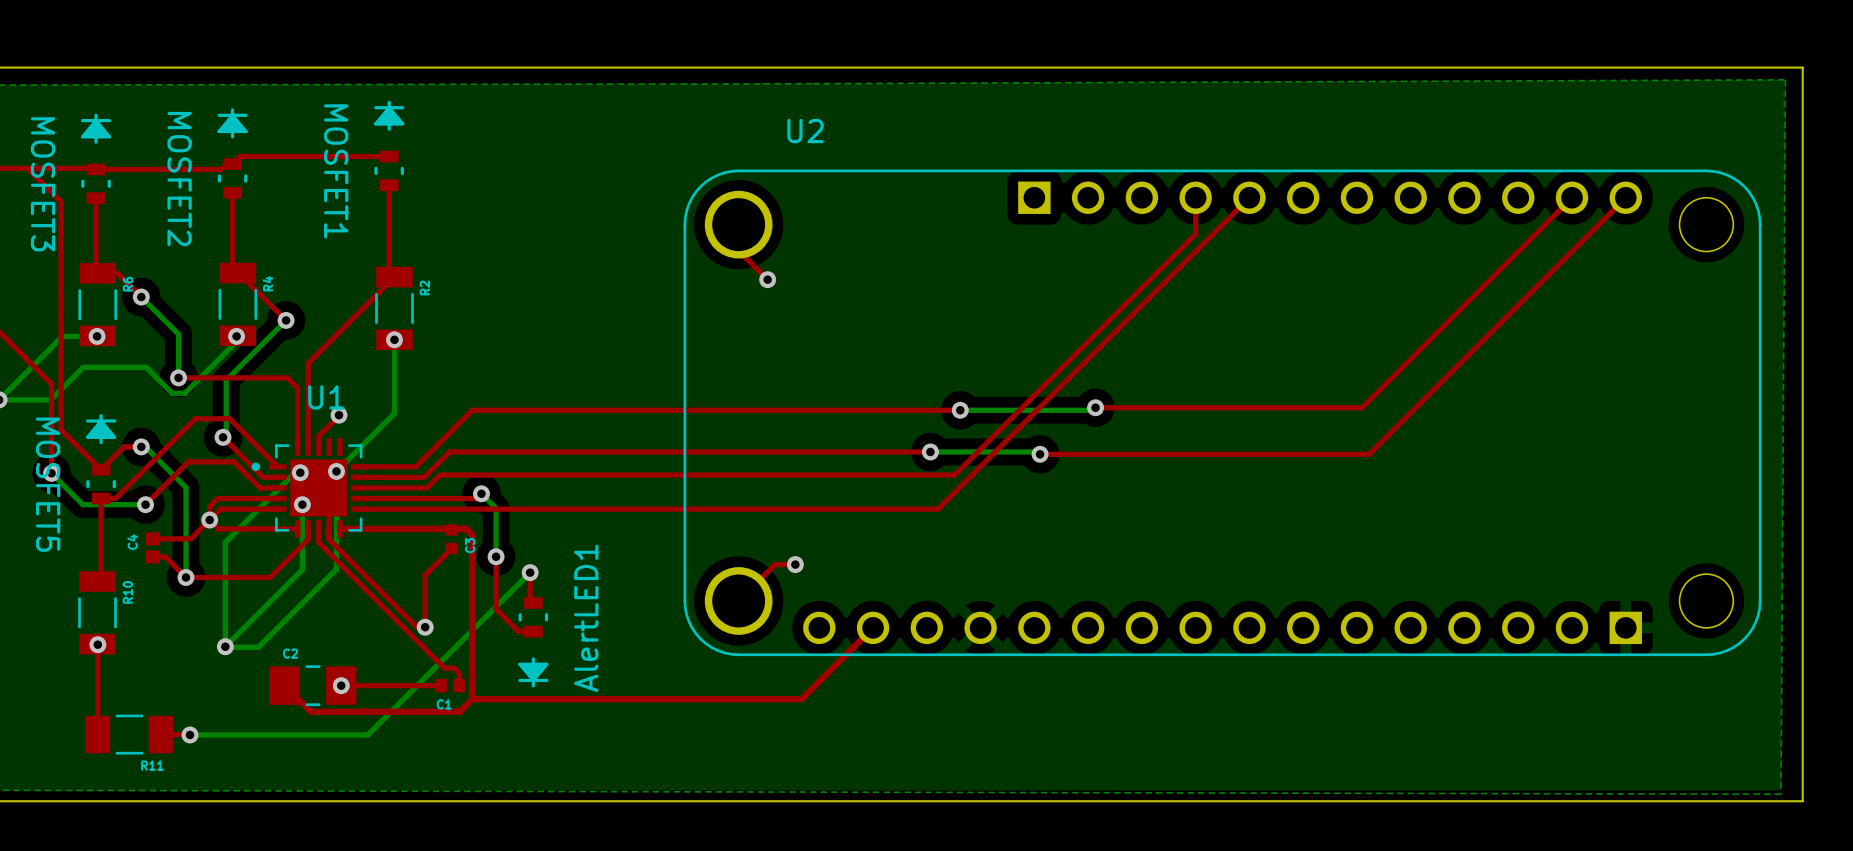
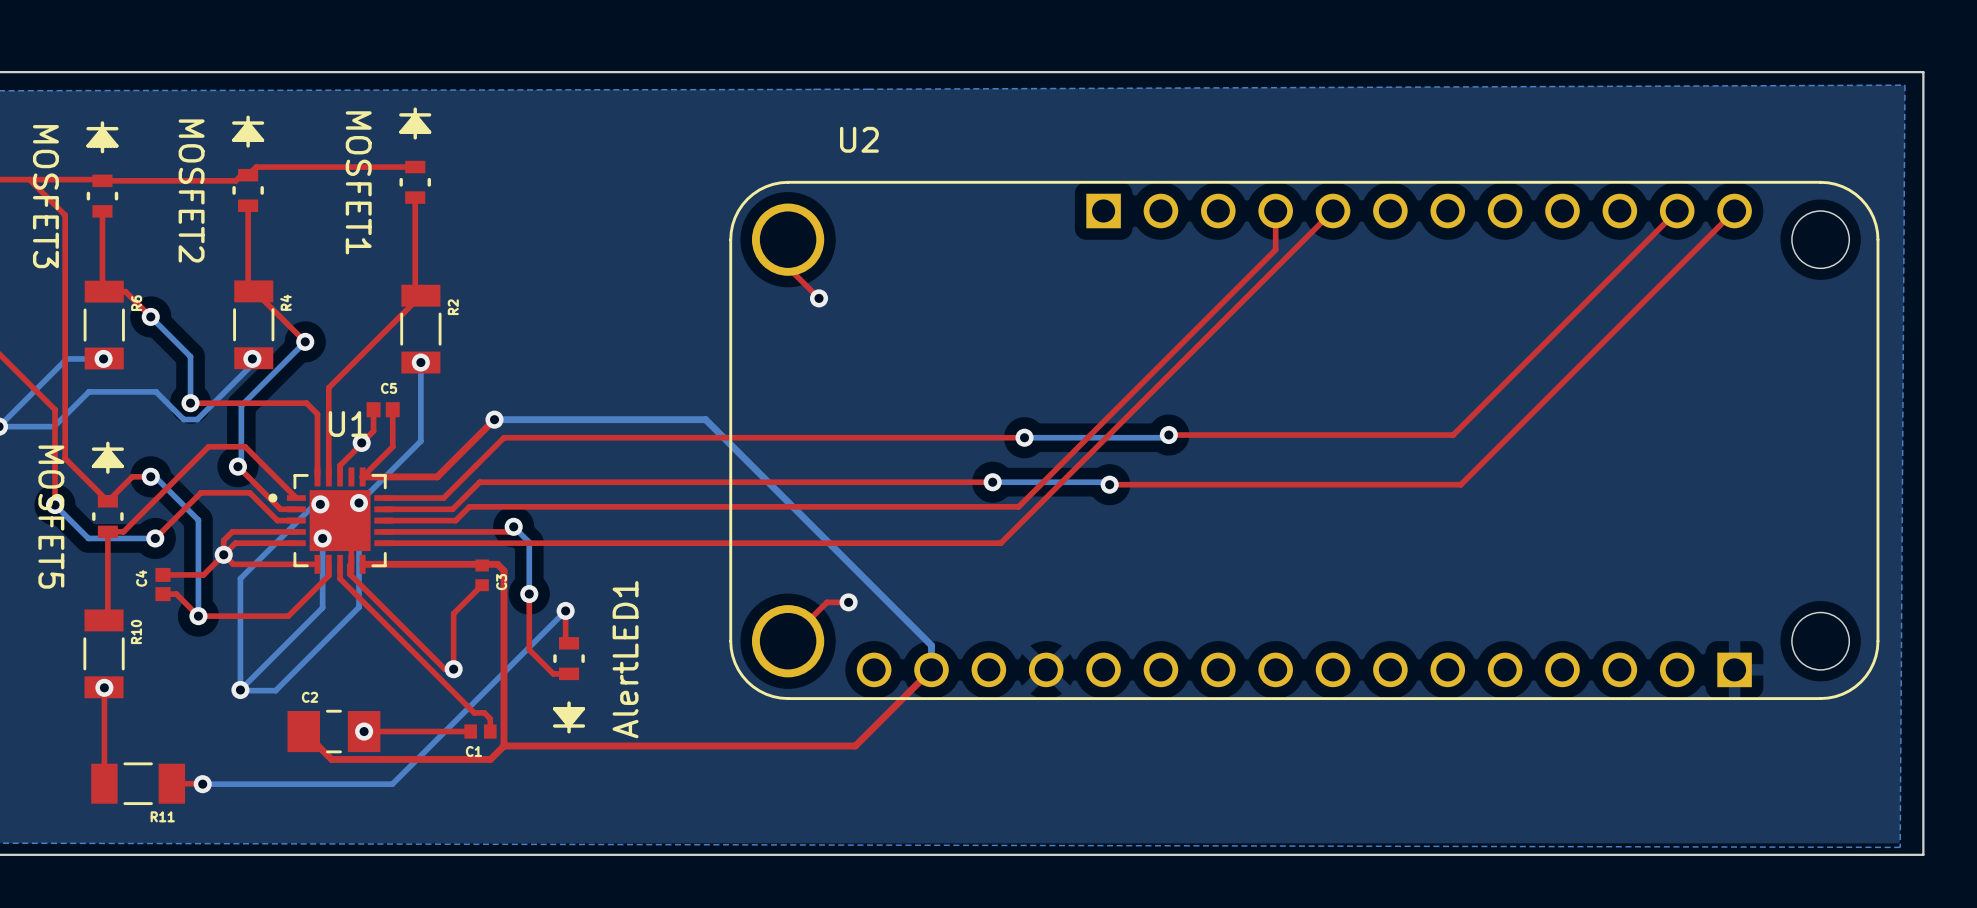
top track: none -> (373, 409) (373, 431) (361, 442)
C5: none -> (383, 409)
top track: none -> (392, 409) (392, 446) (362, 476) (437, 476) (494, 419)
bottom track: none -> (494, 419) (705, 419) (931, 645) (931, 669)
via: none -> (494, 419)

